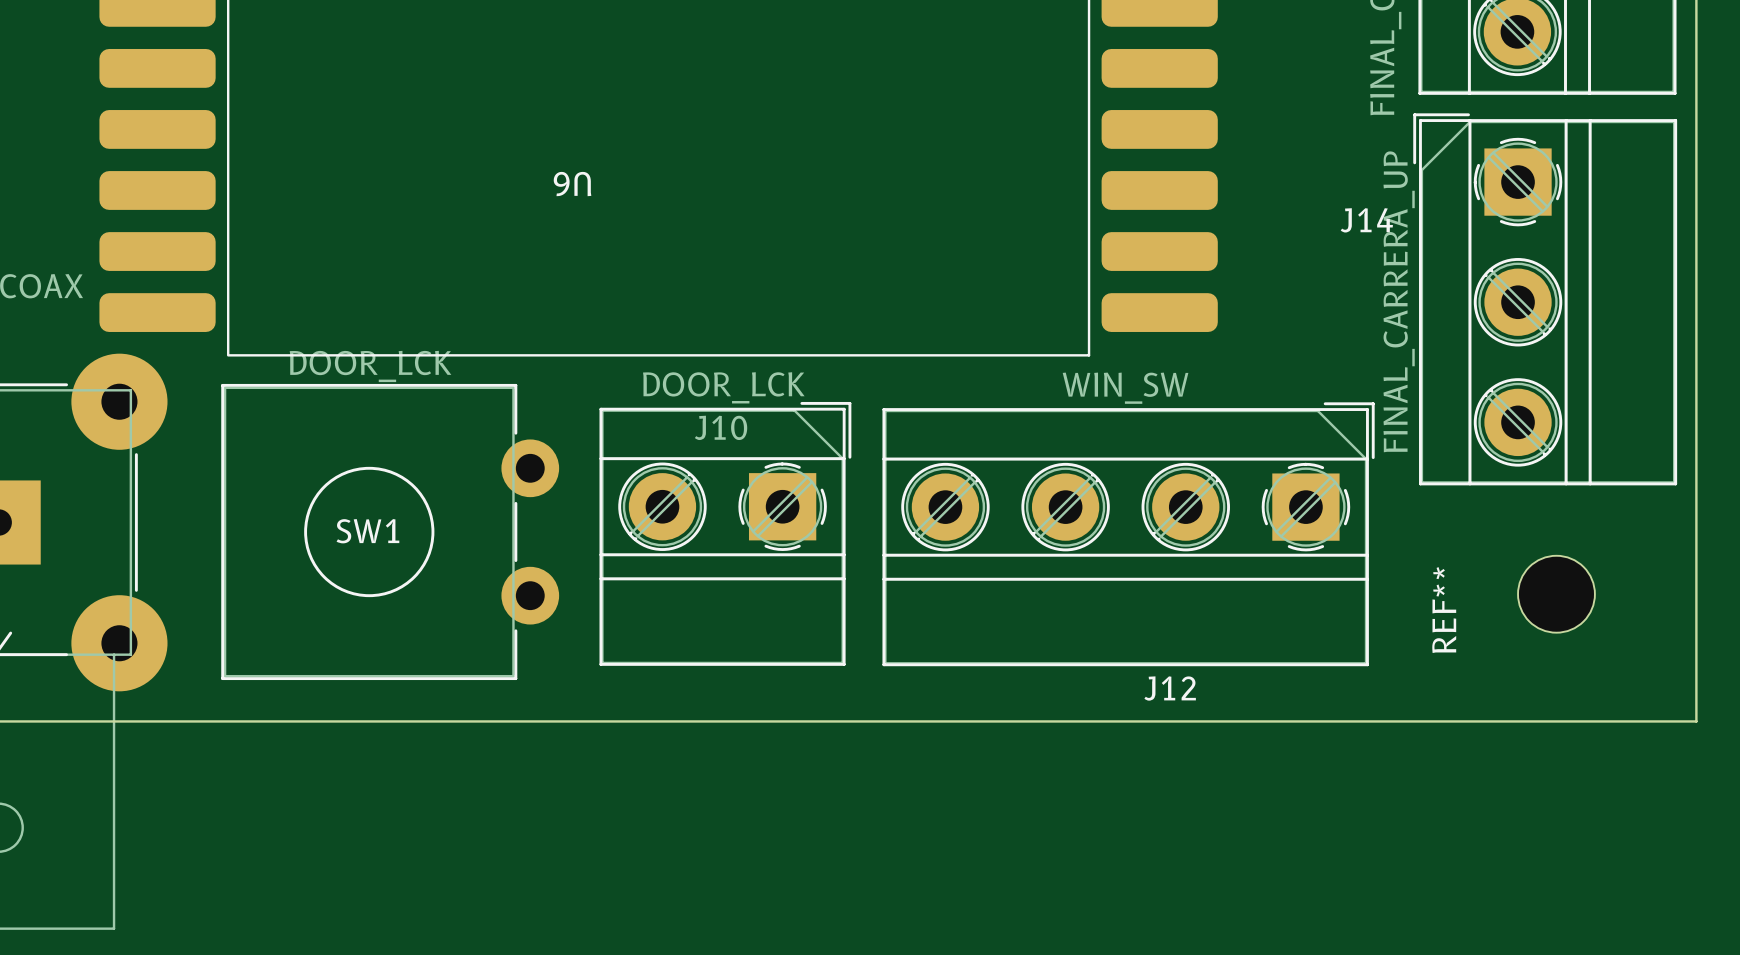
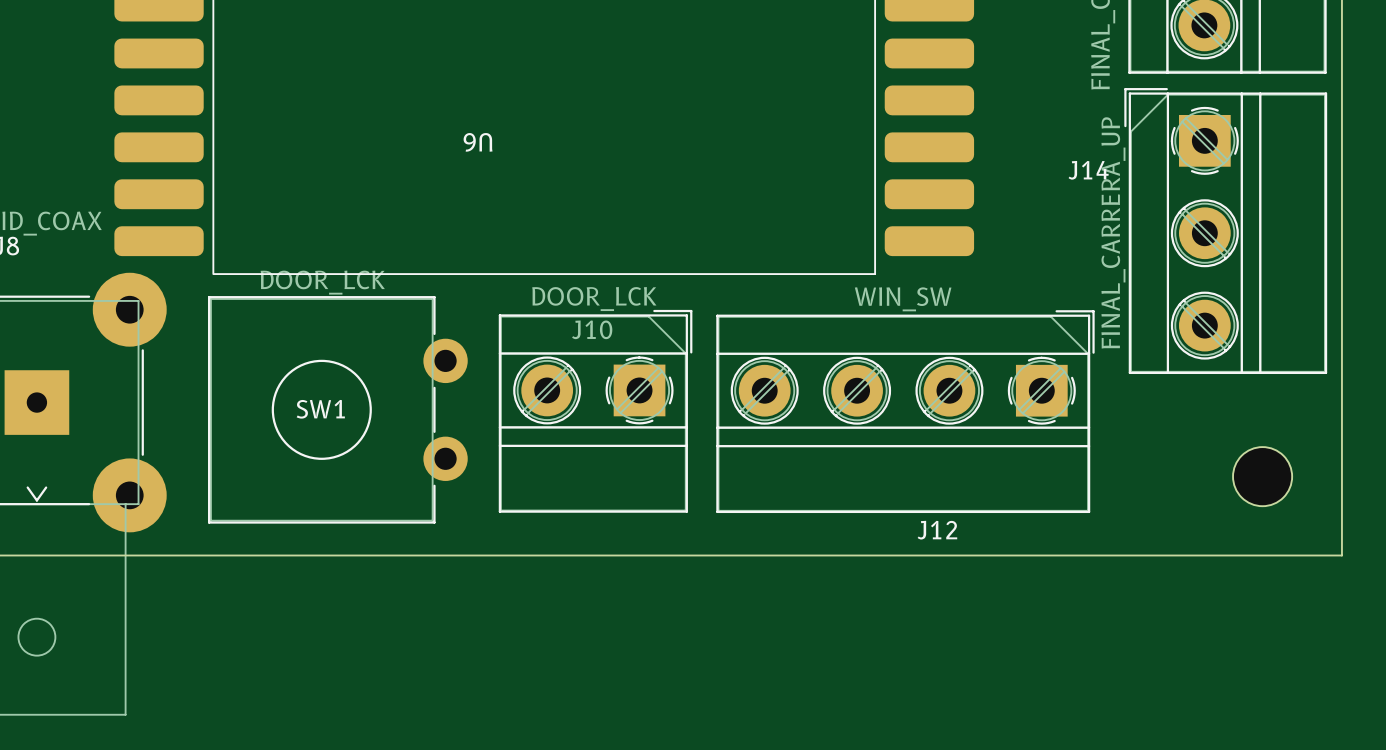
REF**: (1556, 594) -> none
part: none -> (1262, 476)

